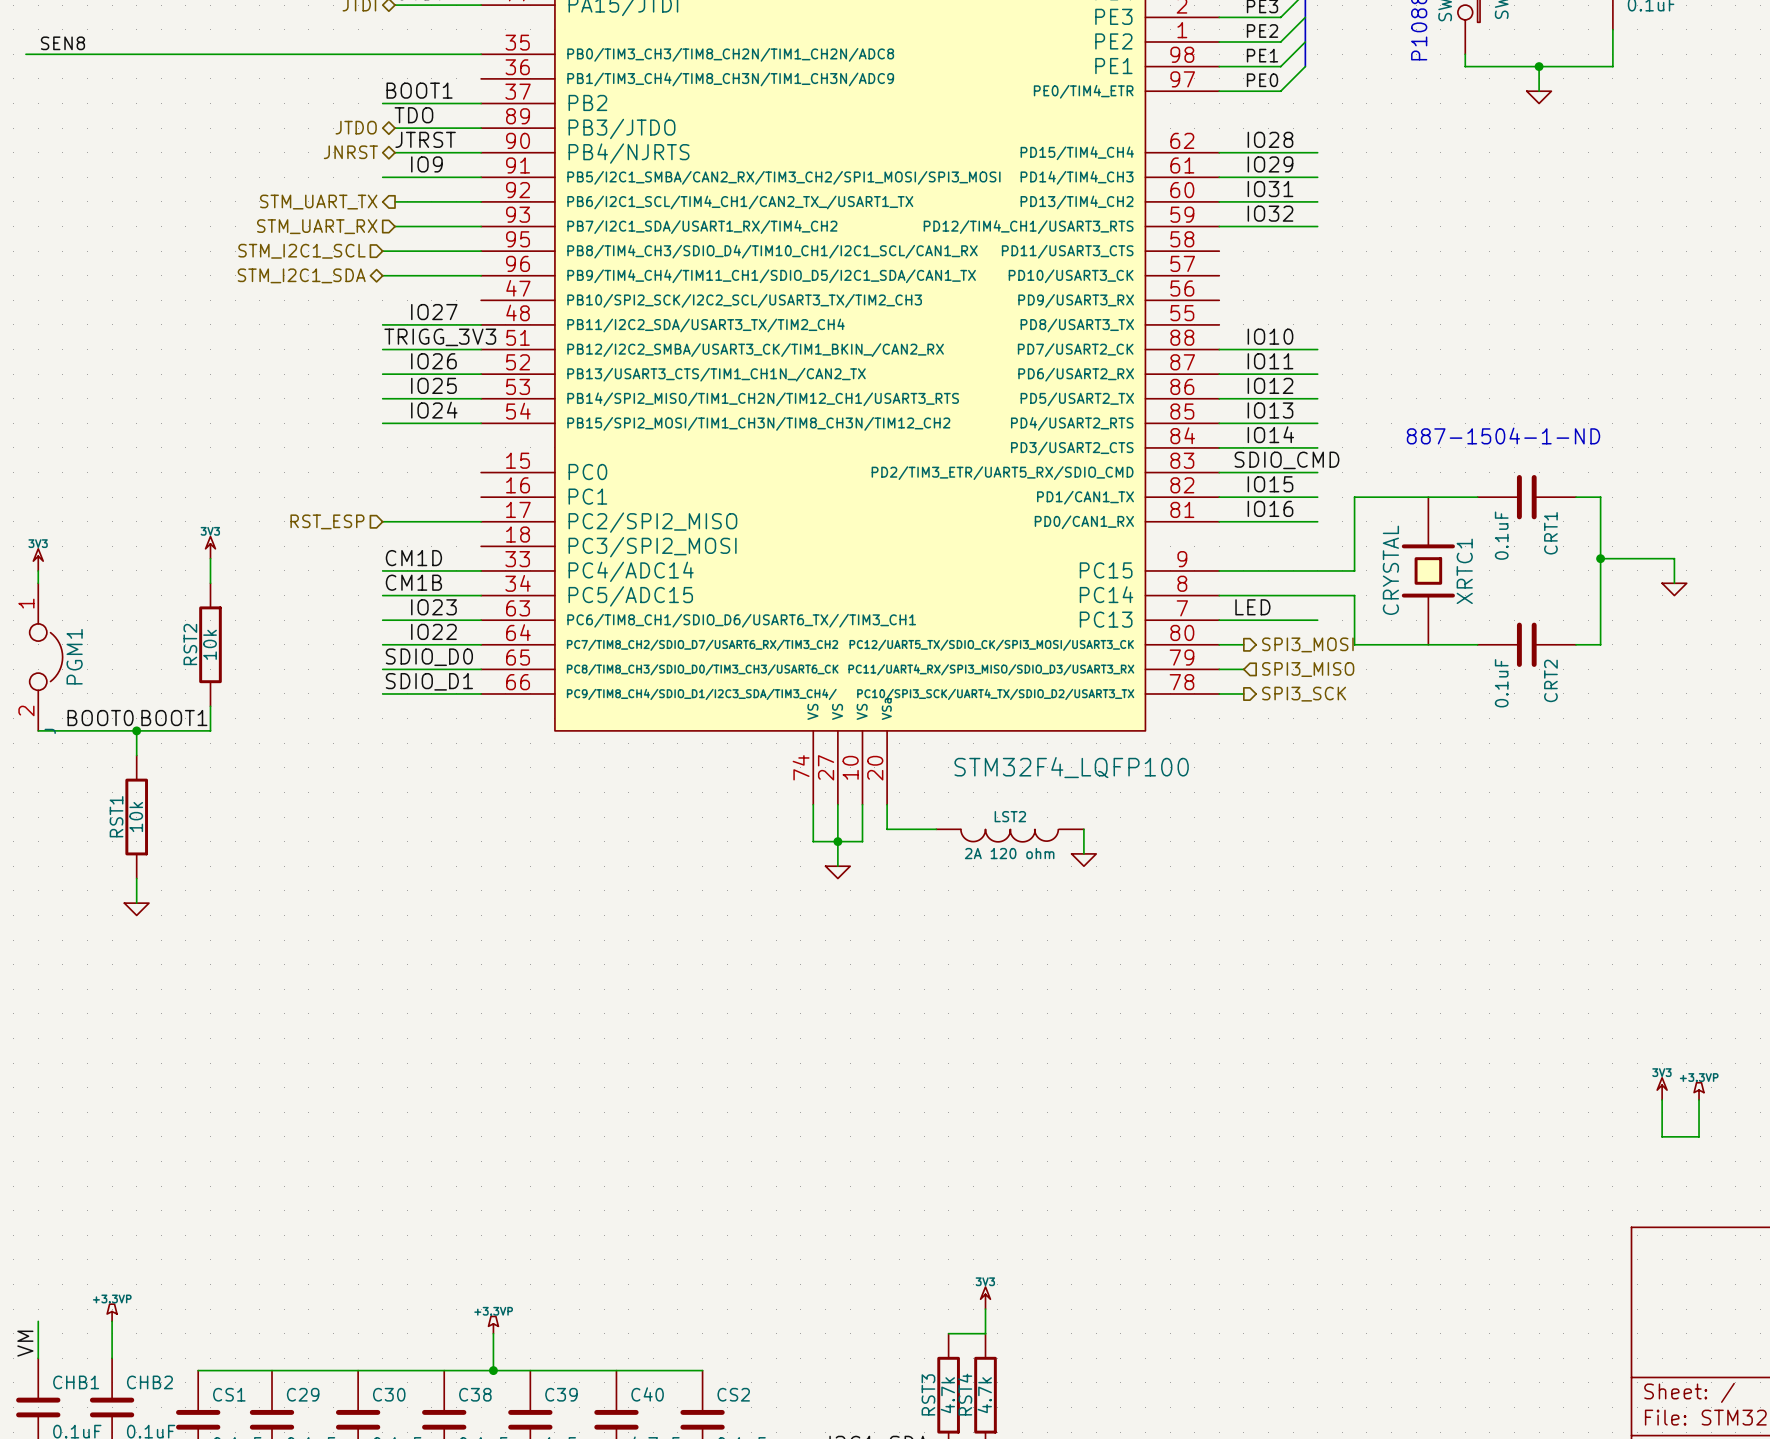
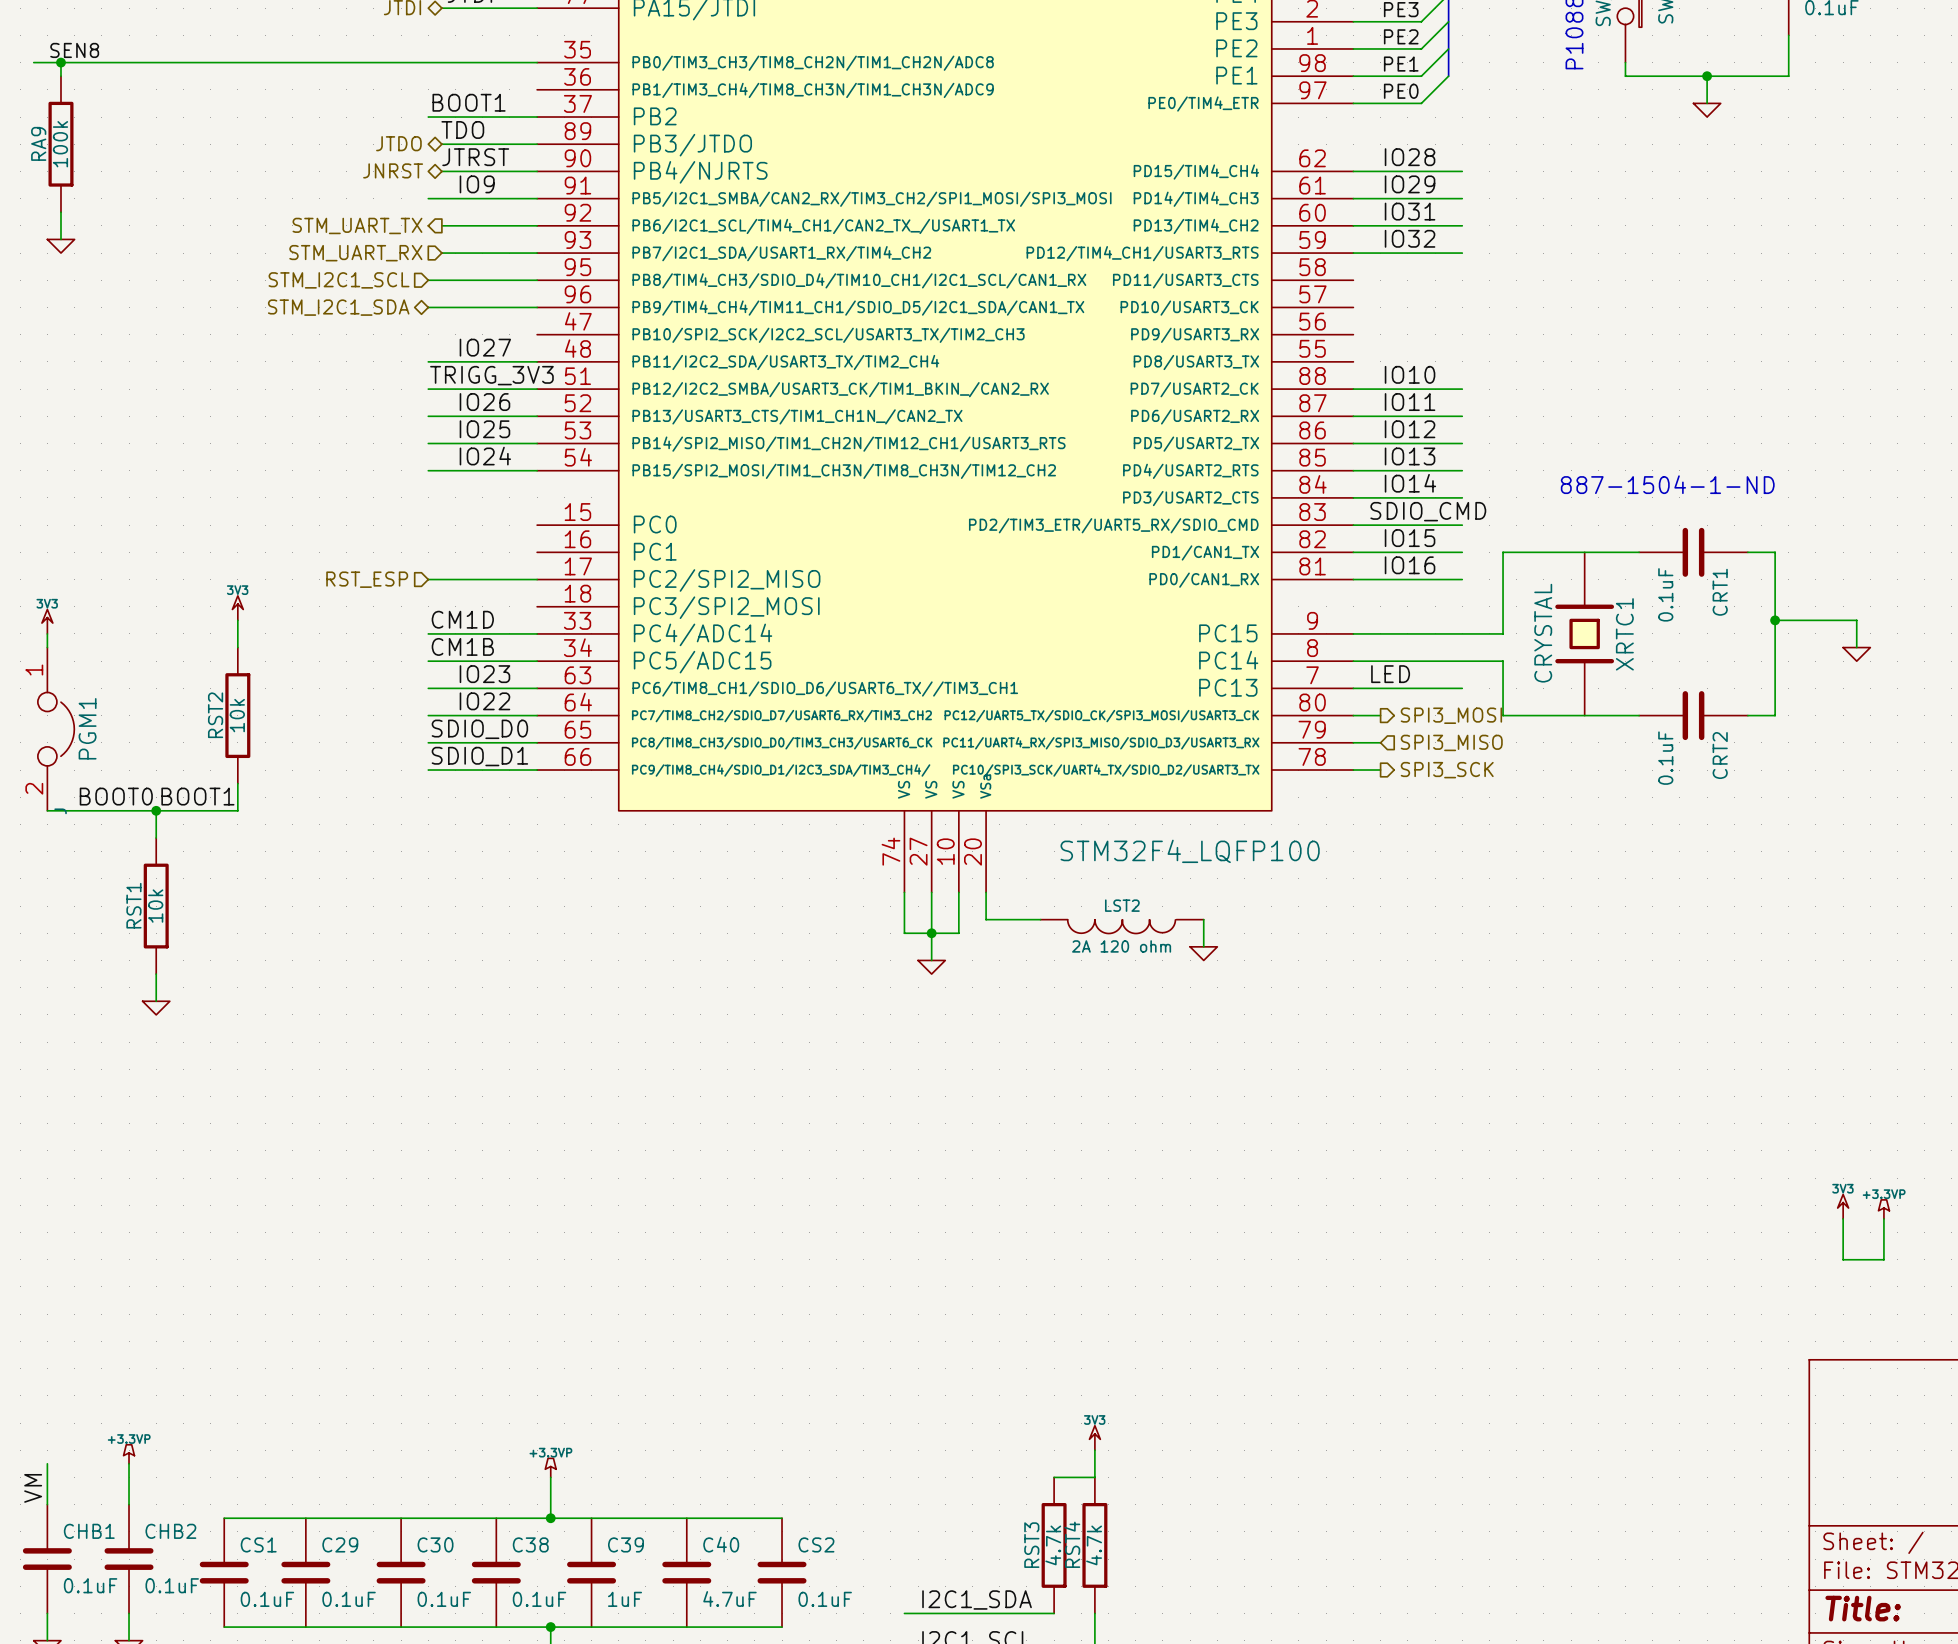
wire: none -> (60, 62) (60, 76)
junction: none -> (60, 62)
RA9: none -> 100k (60, 144)
wire: none -> (60, 212) (60, 239)
power symbol: none -> (60, 246)

